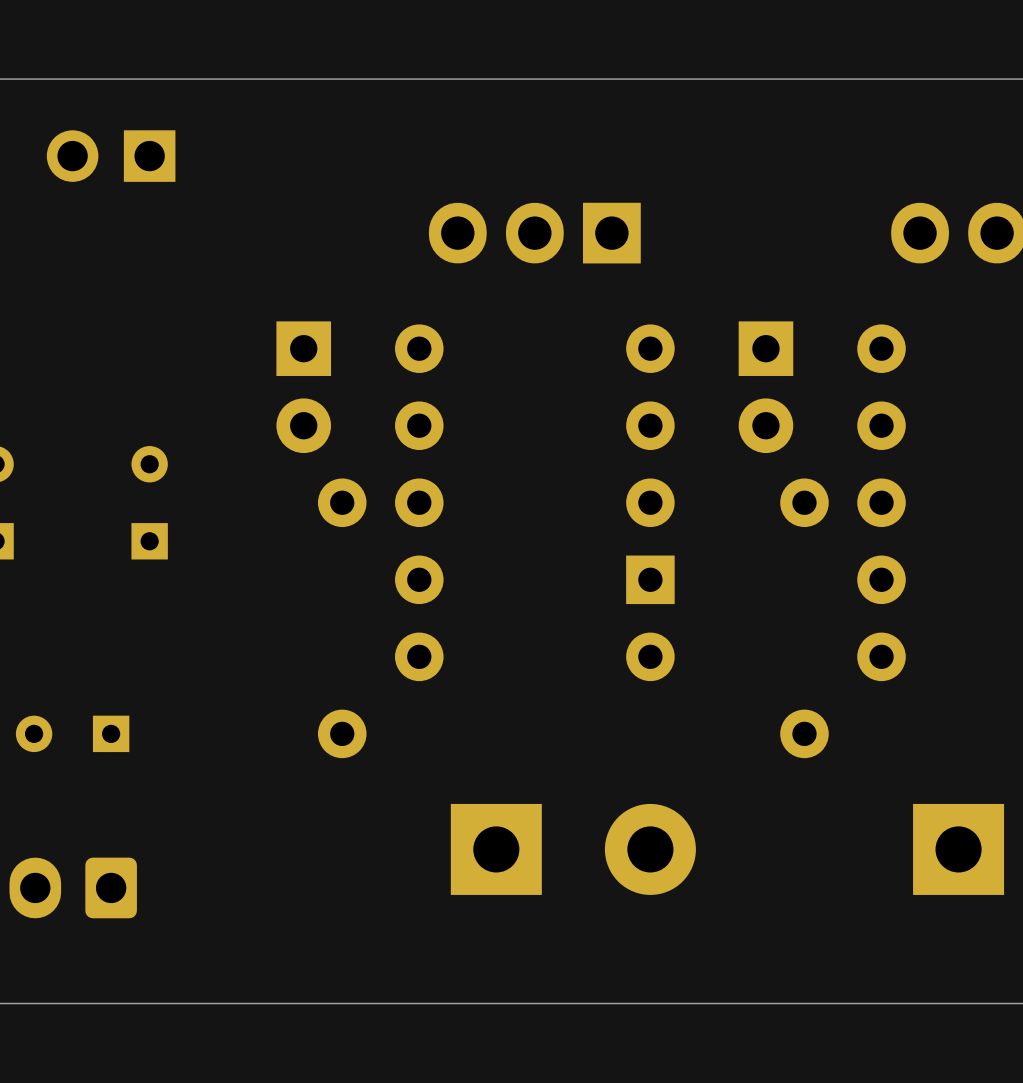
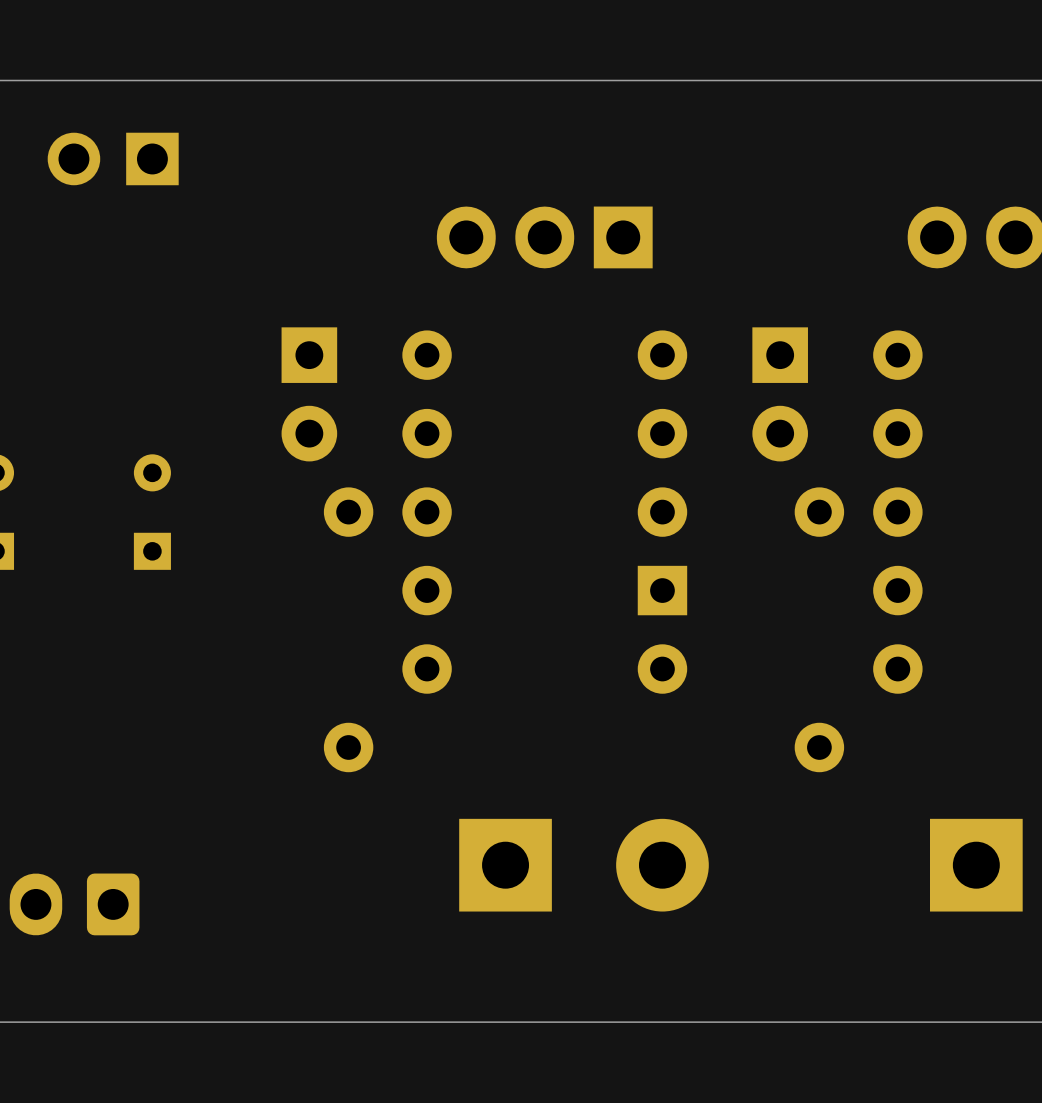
part: (72, 733) -> none

